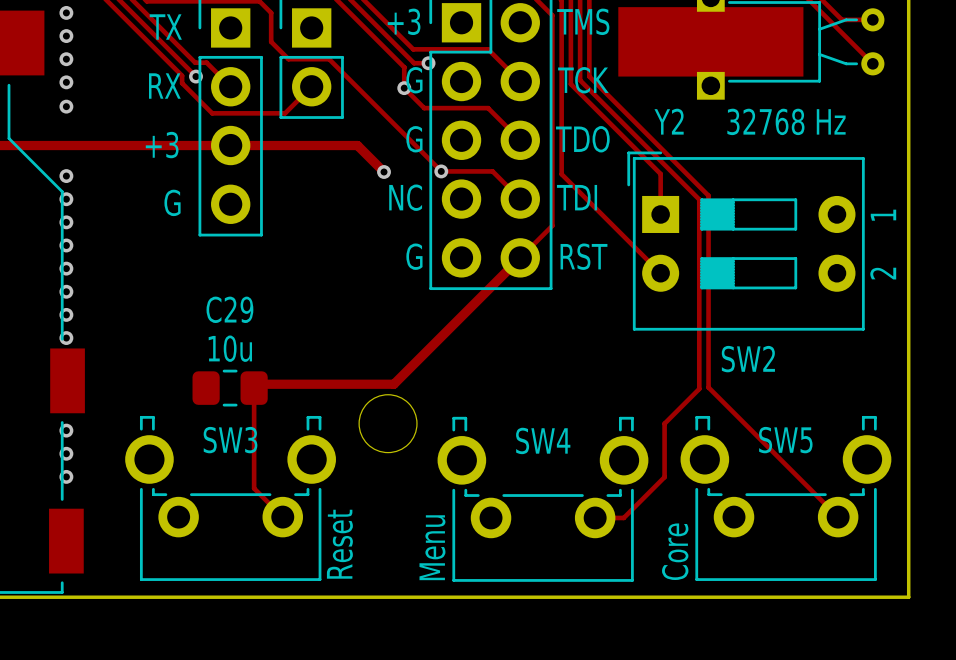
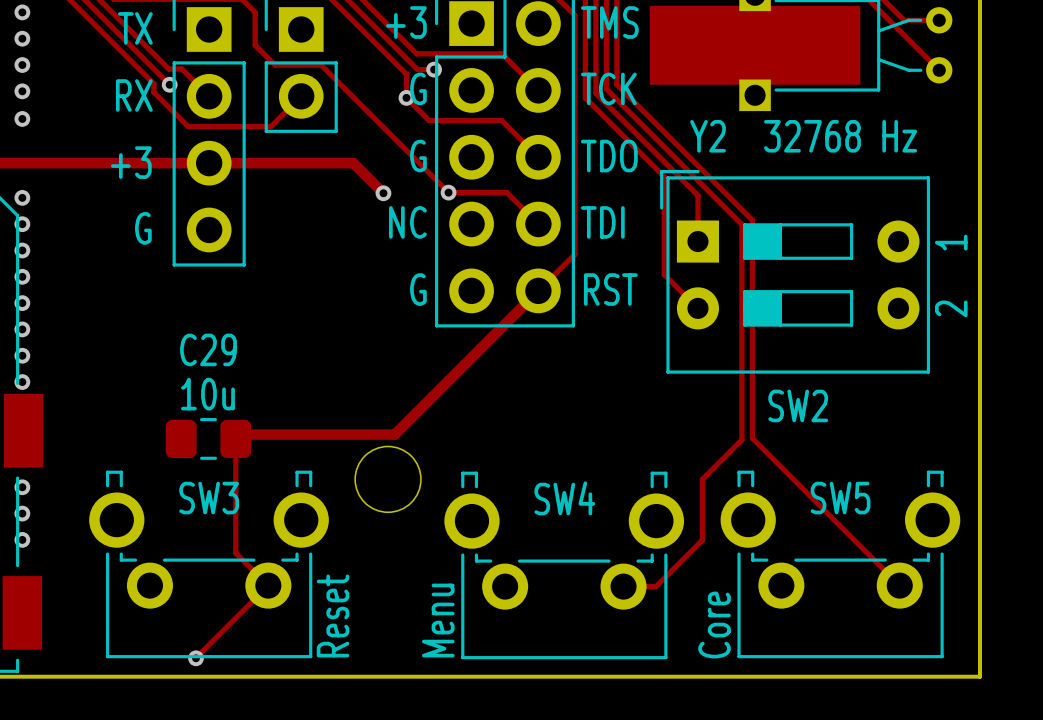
track: (561, 88) (561, 174) (631, 243) -> (585, 97) (664, 176) (664, 274)
track: none -> (268, 585) (196, 657)
via: none -> (196, 658)

